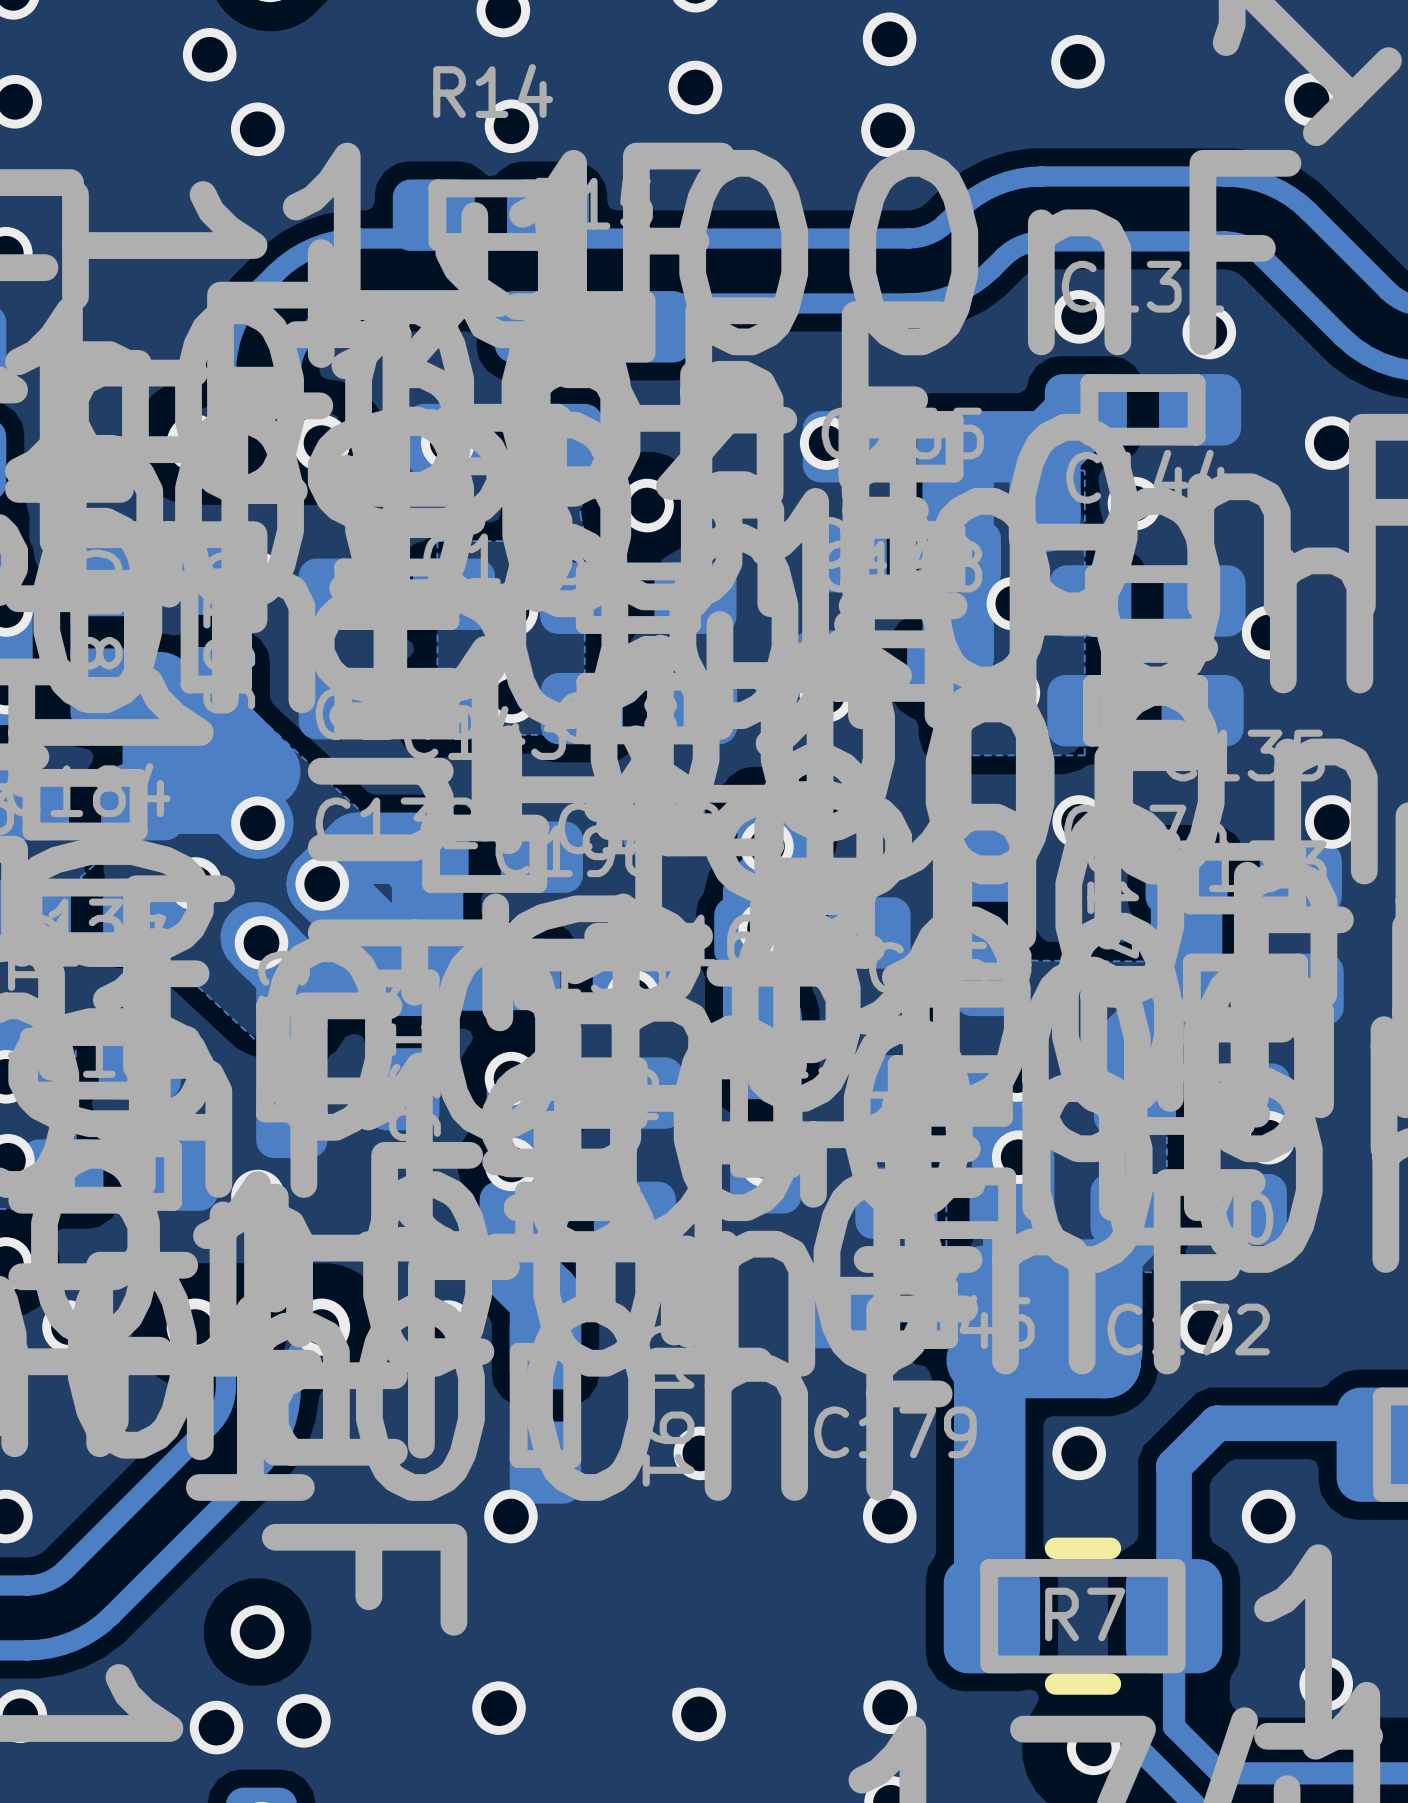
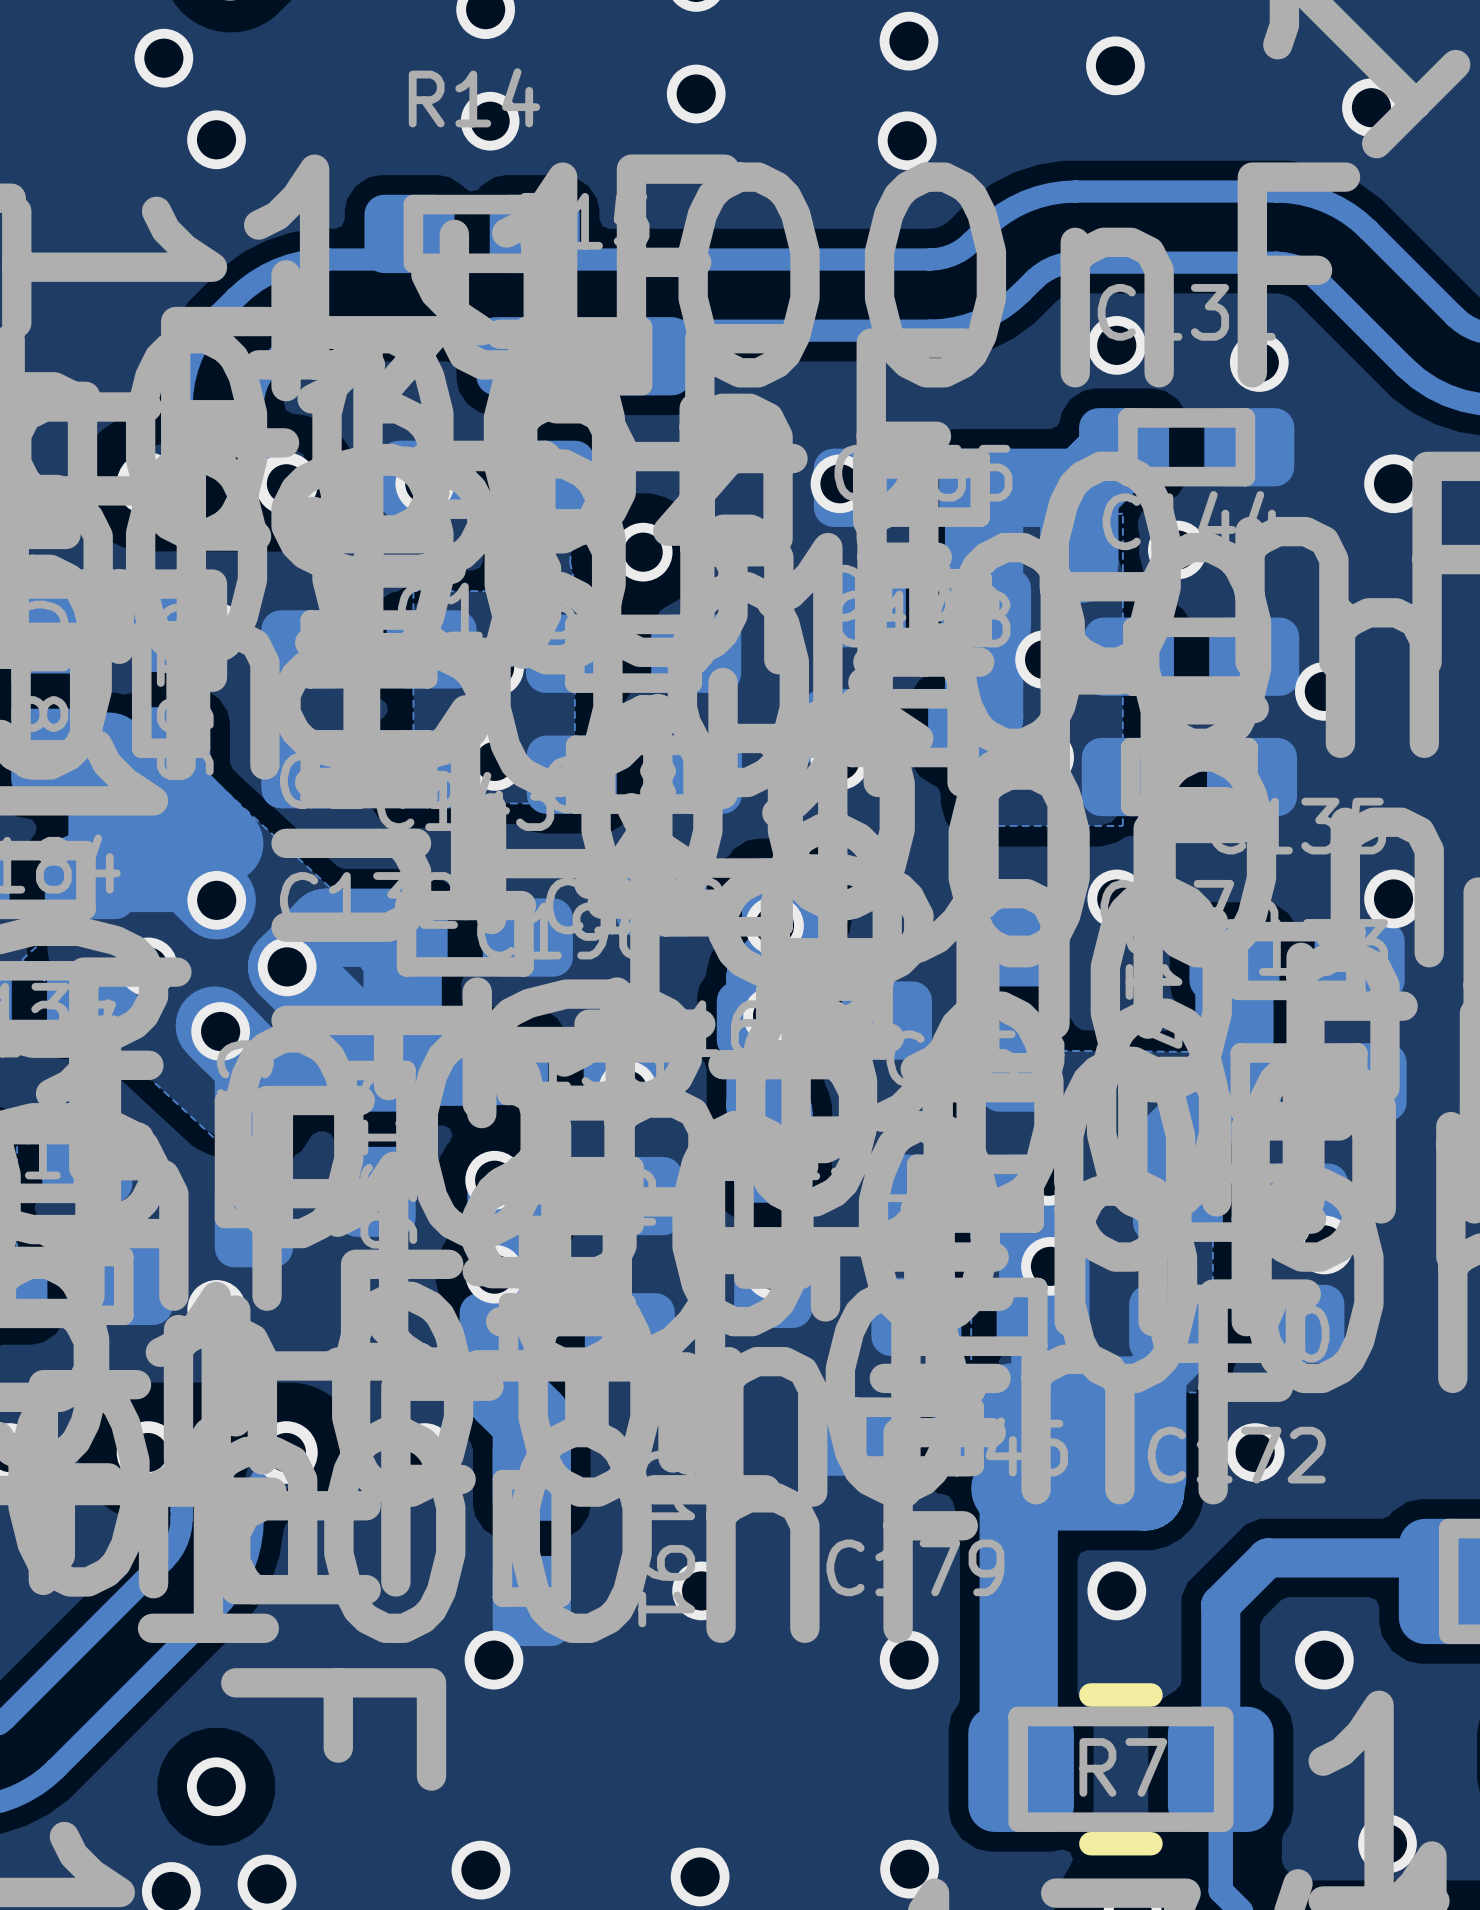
via position: (511, 126) -> (490, 121)

